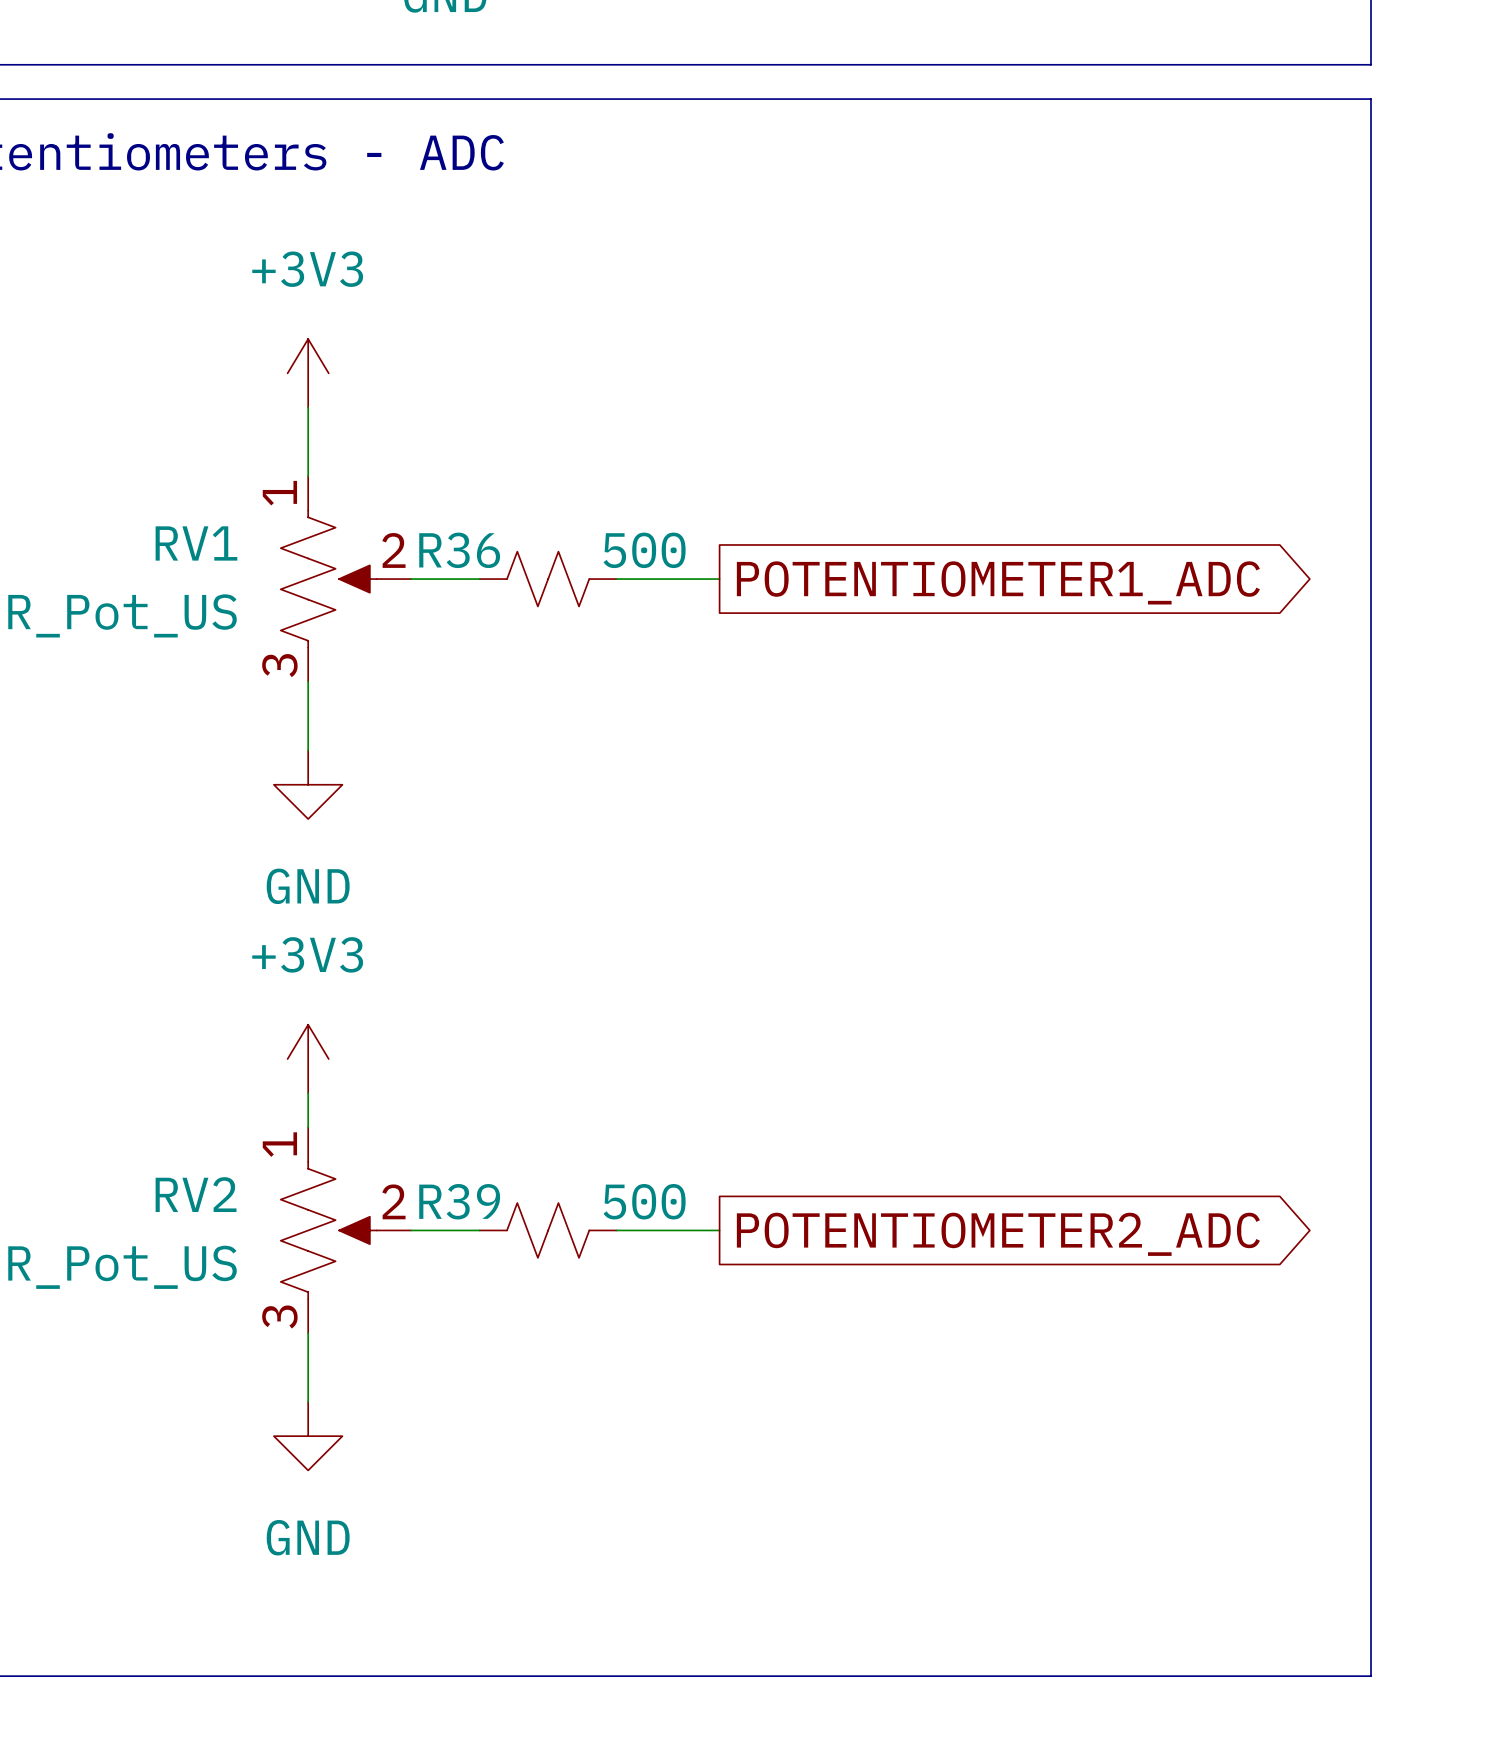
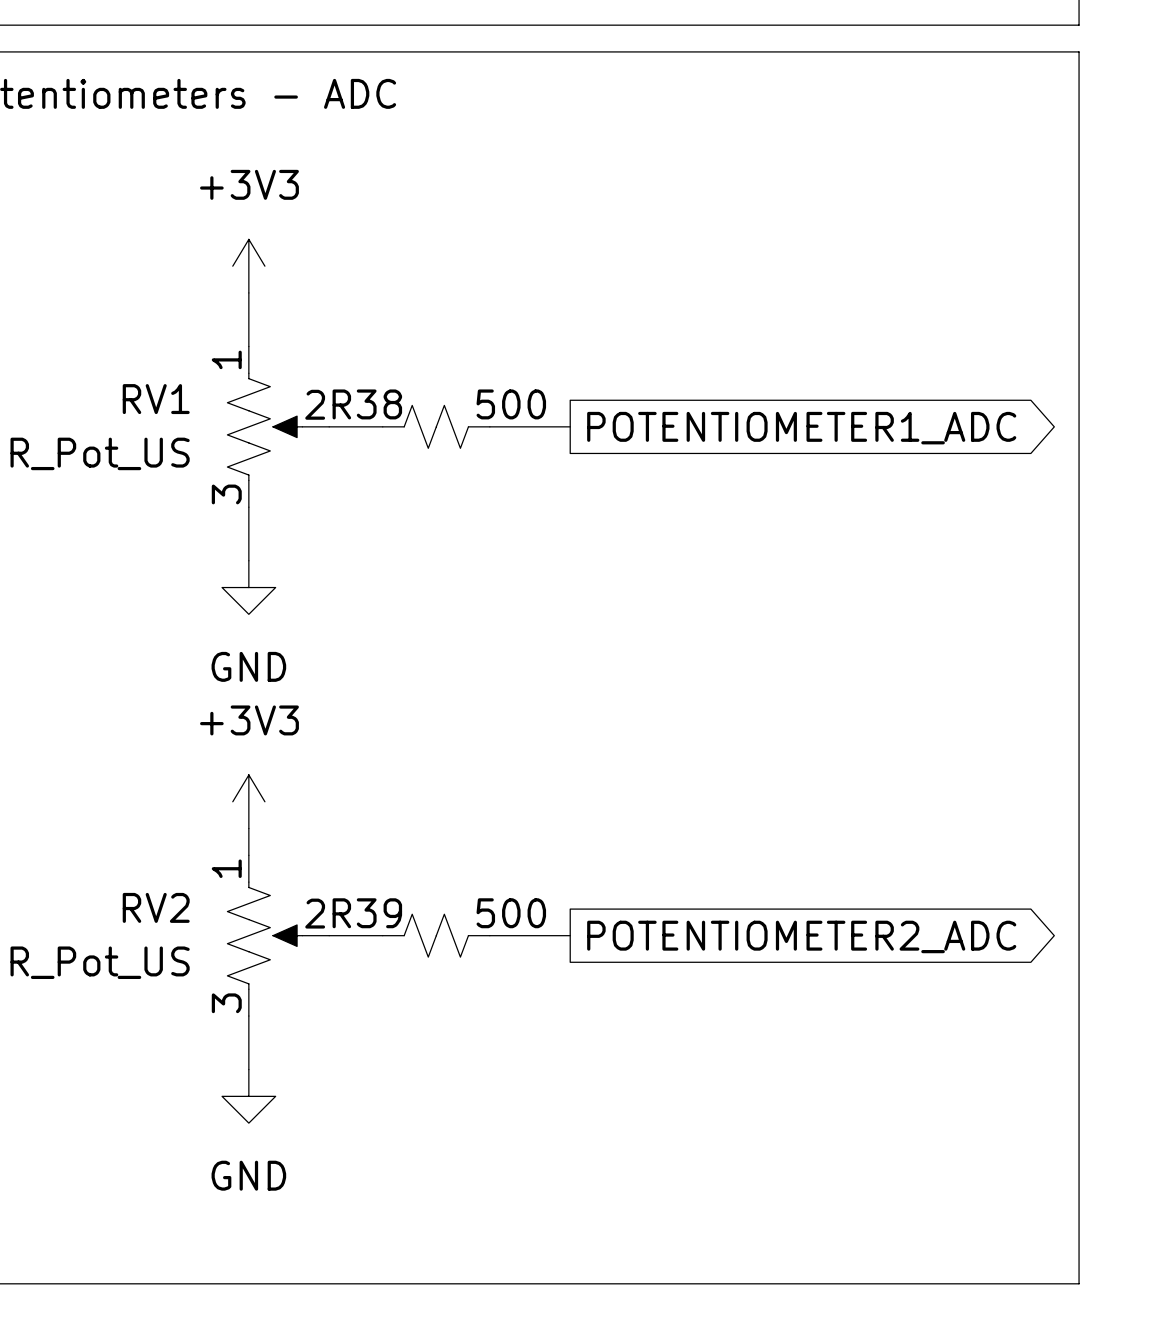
R36 name: R36 (459, 550) -> R38 (367, 404)

